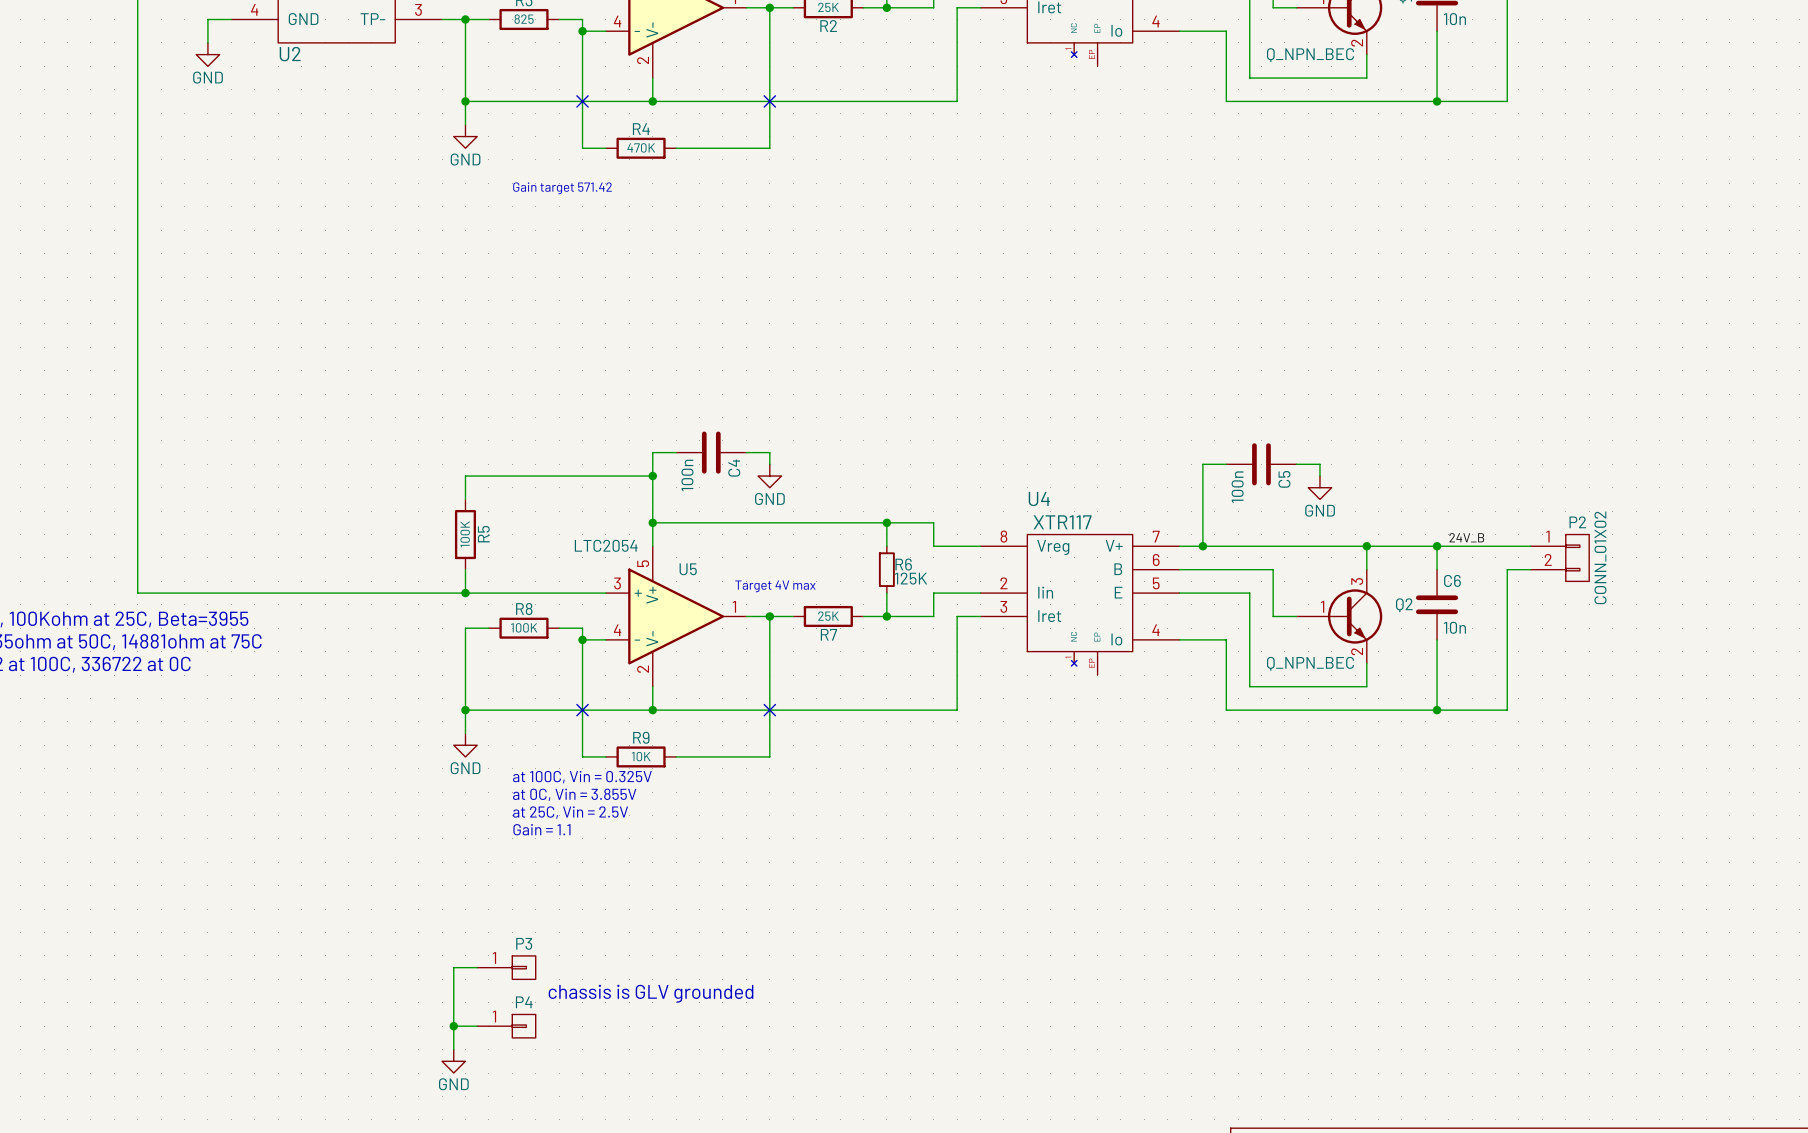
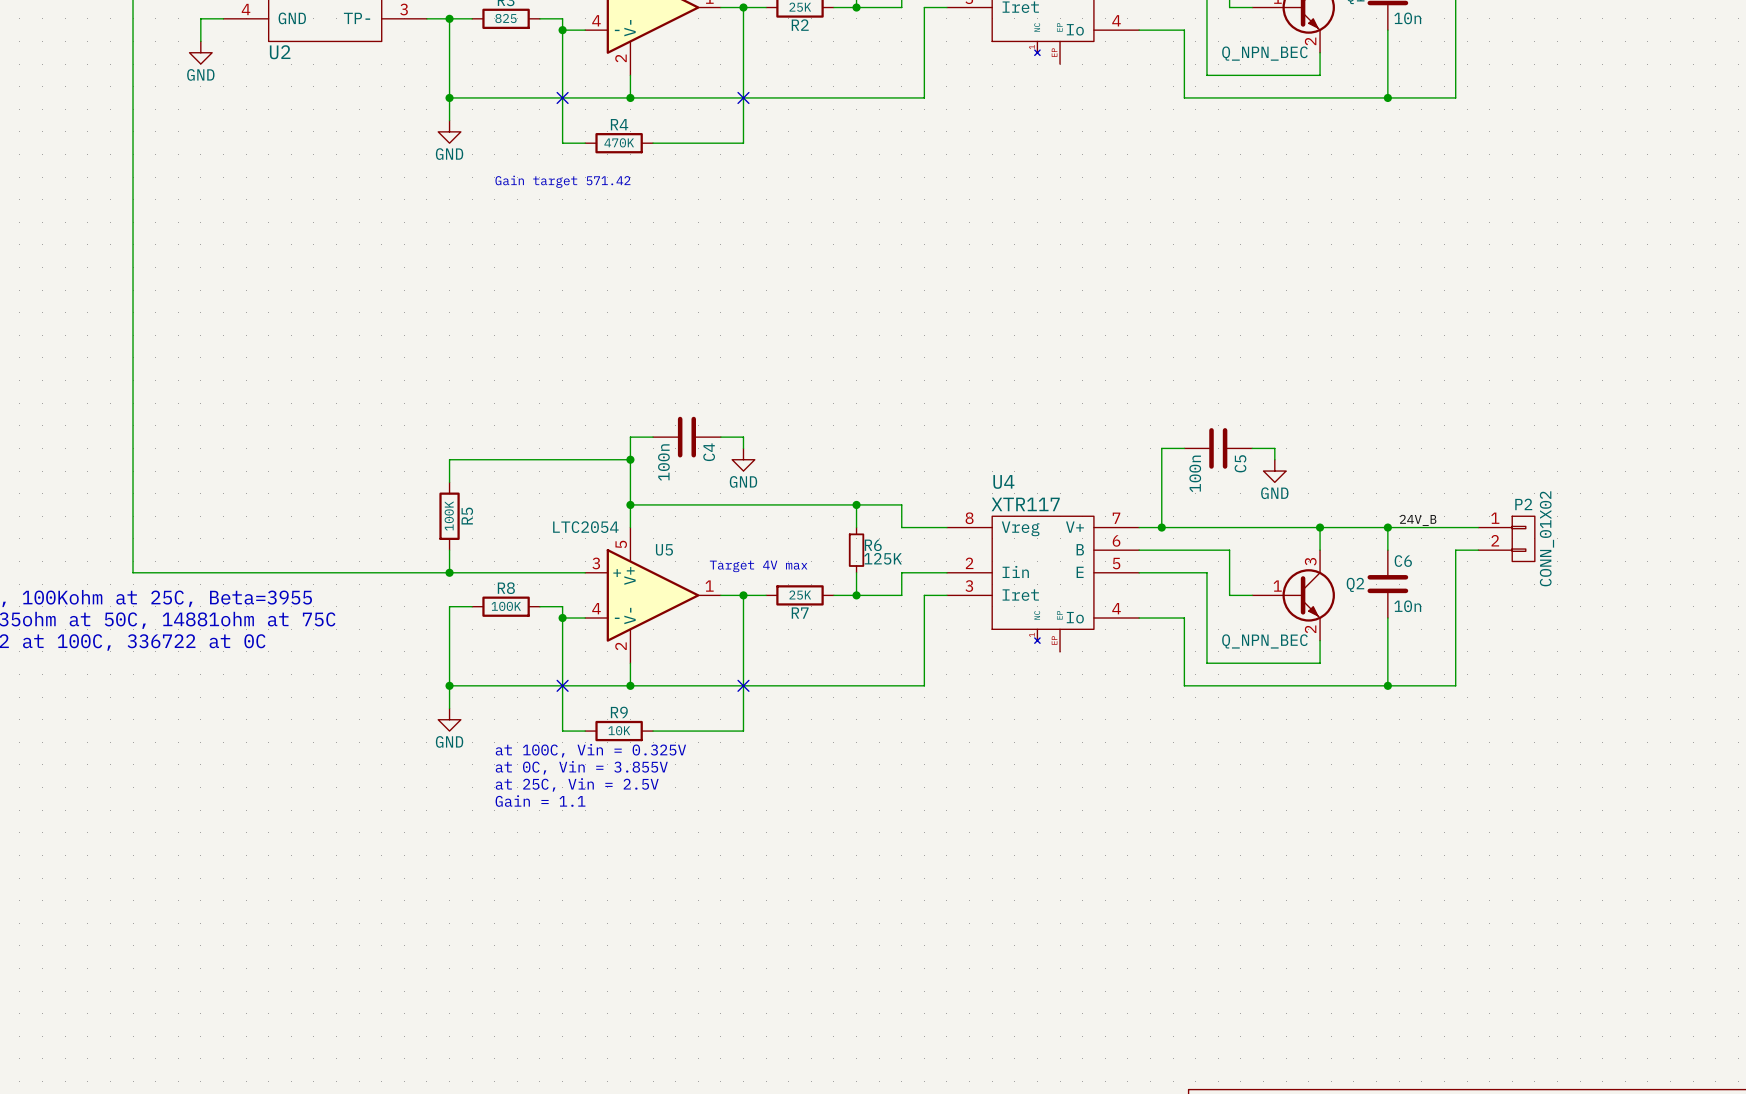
wire: (477, 967) (453, 967) (453, 1049) -> none
P3: (506, 967) -> none
text: chassis is GLV grounded (651, 993) -> none
wire: (453, 1026) (477, 1026) -> none
junction: (453, 1026) -> none
P4: (506, 1026) -> none
power symbol: GND (453, 1061) -> none

